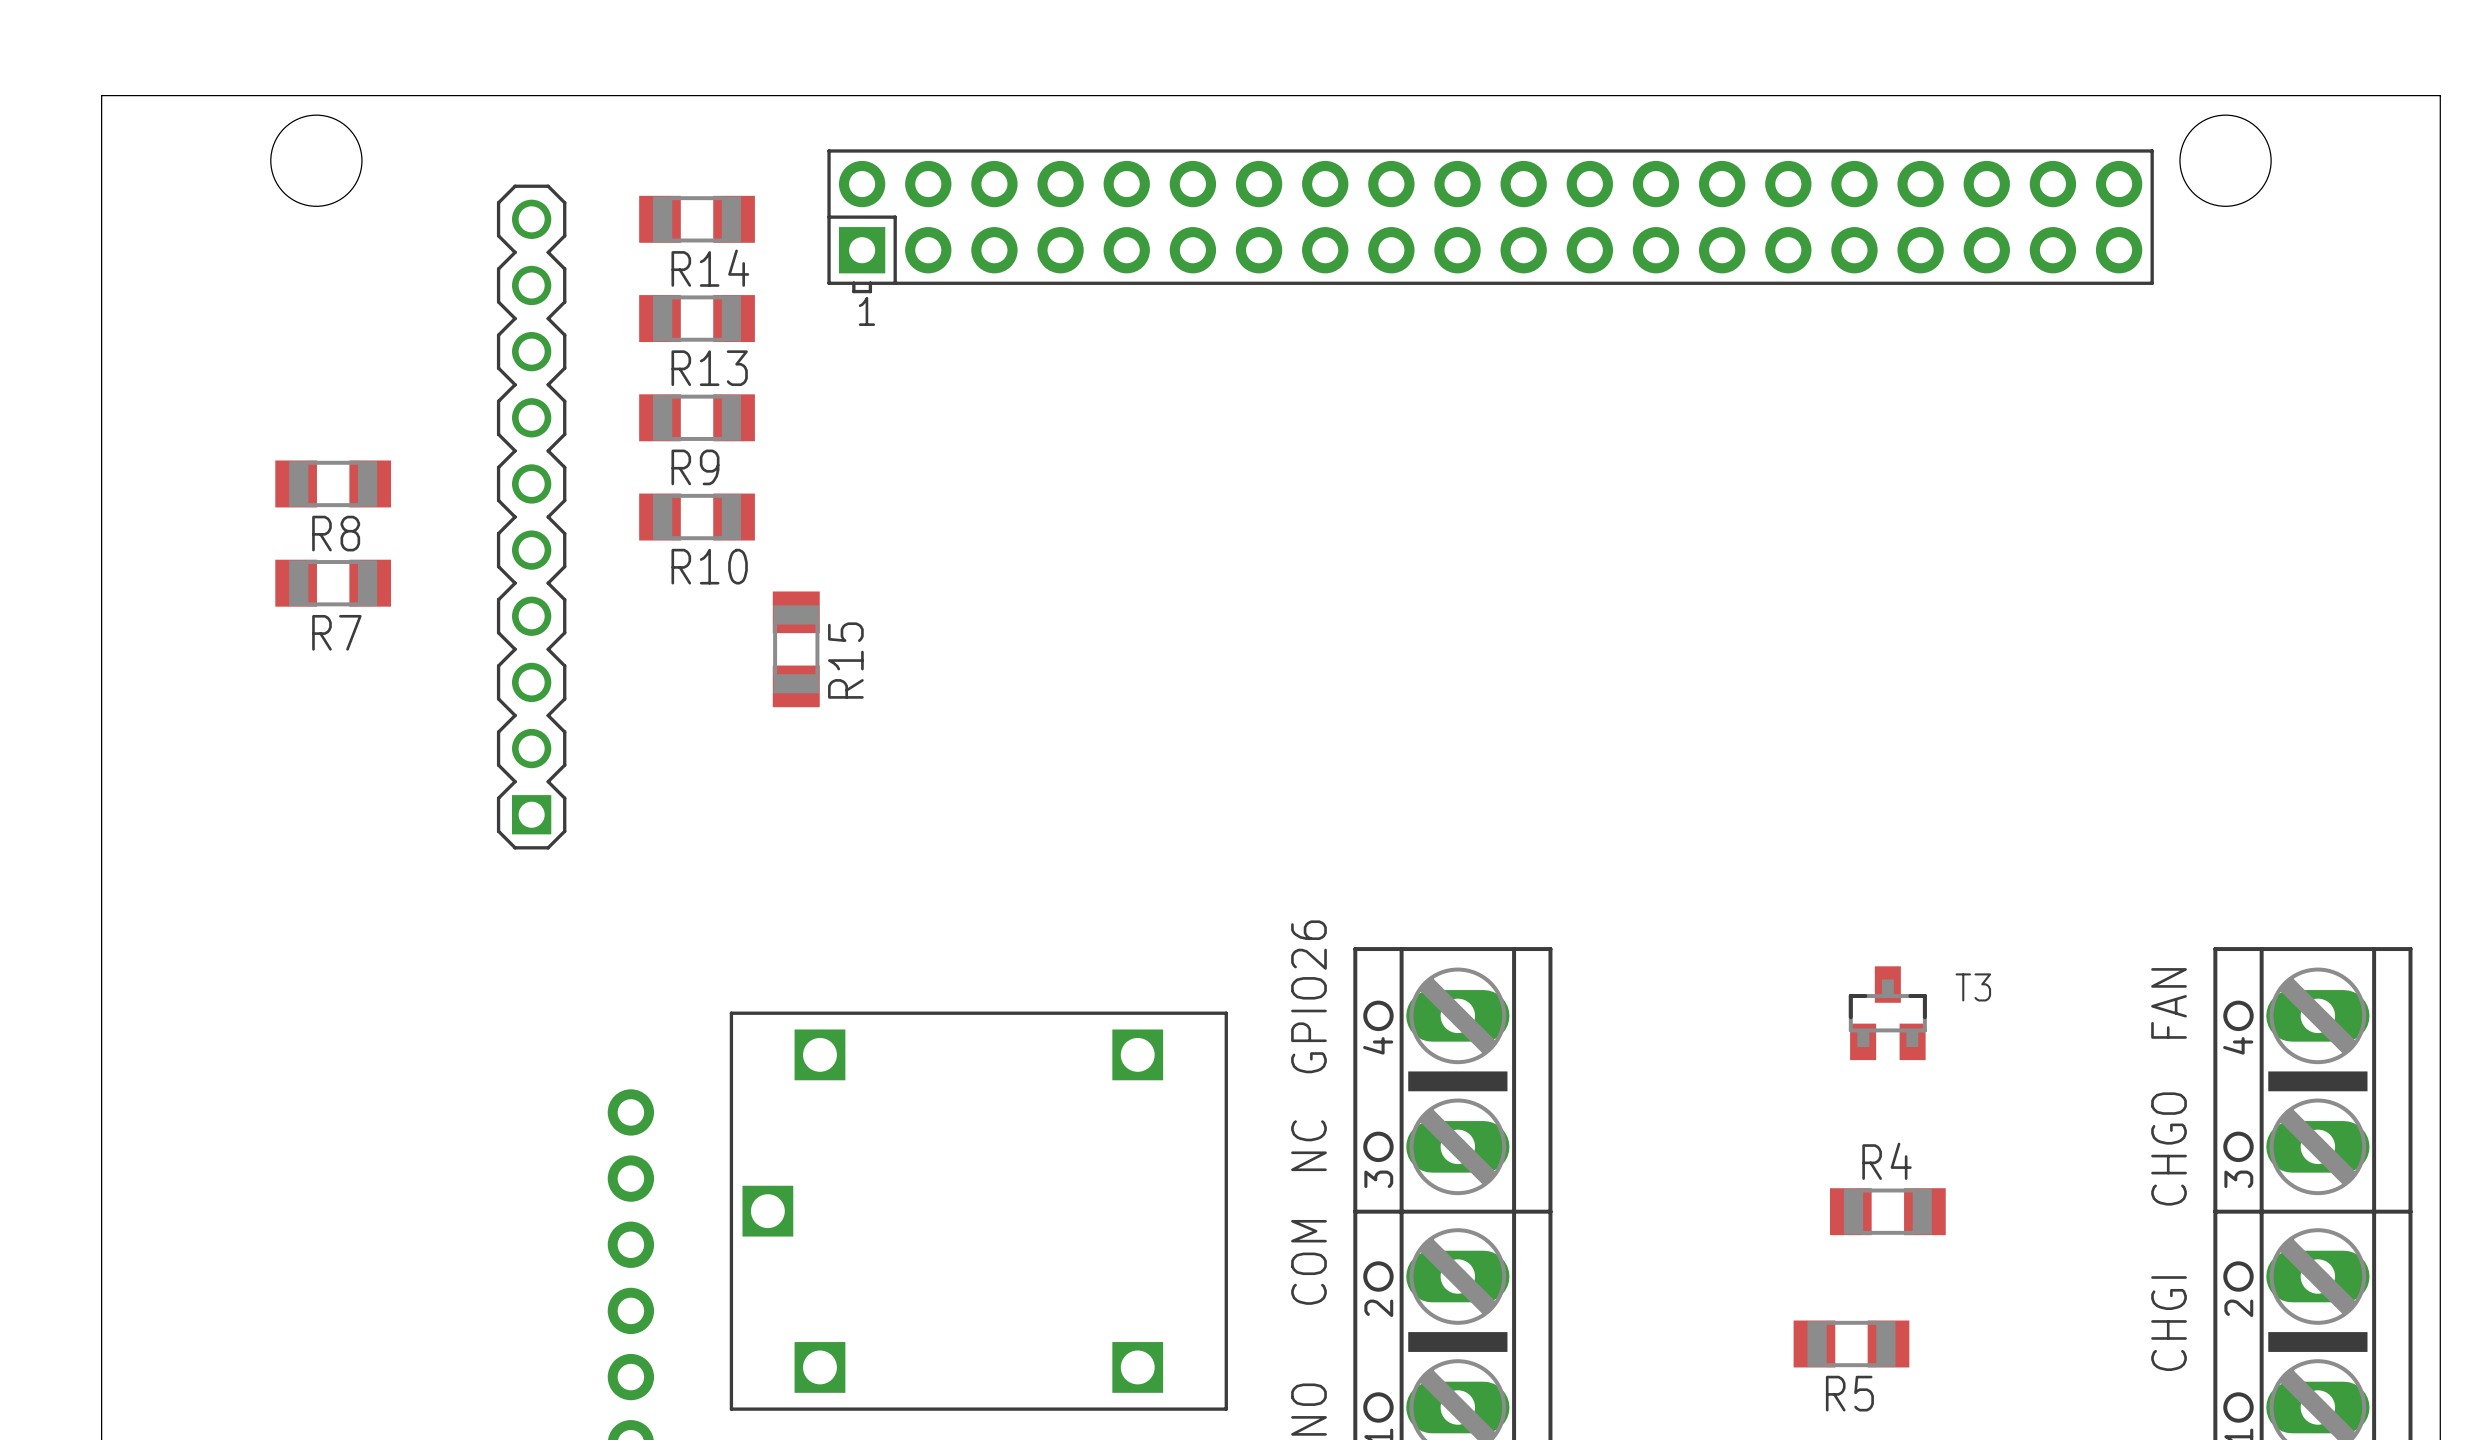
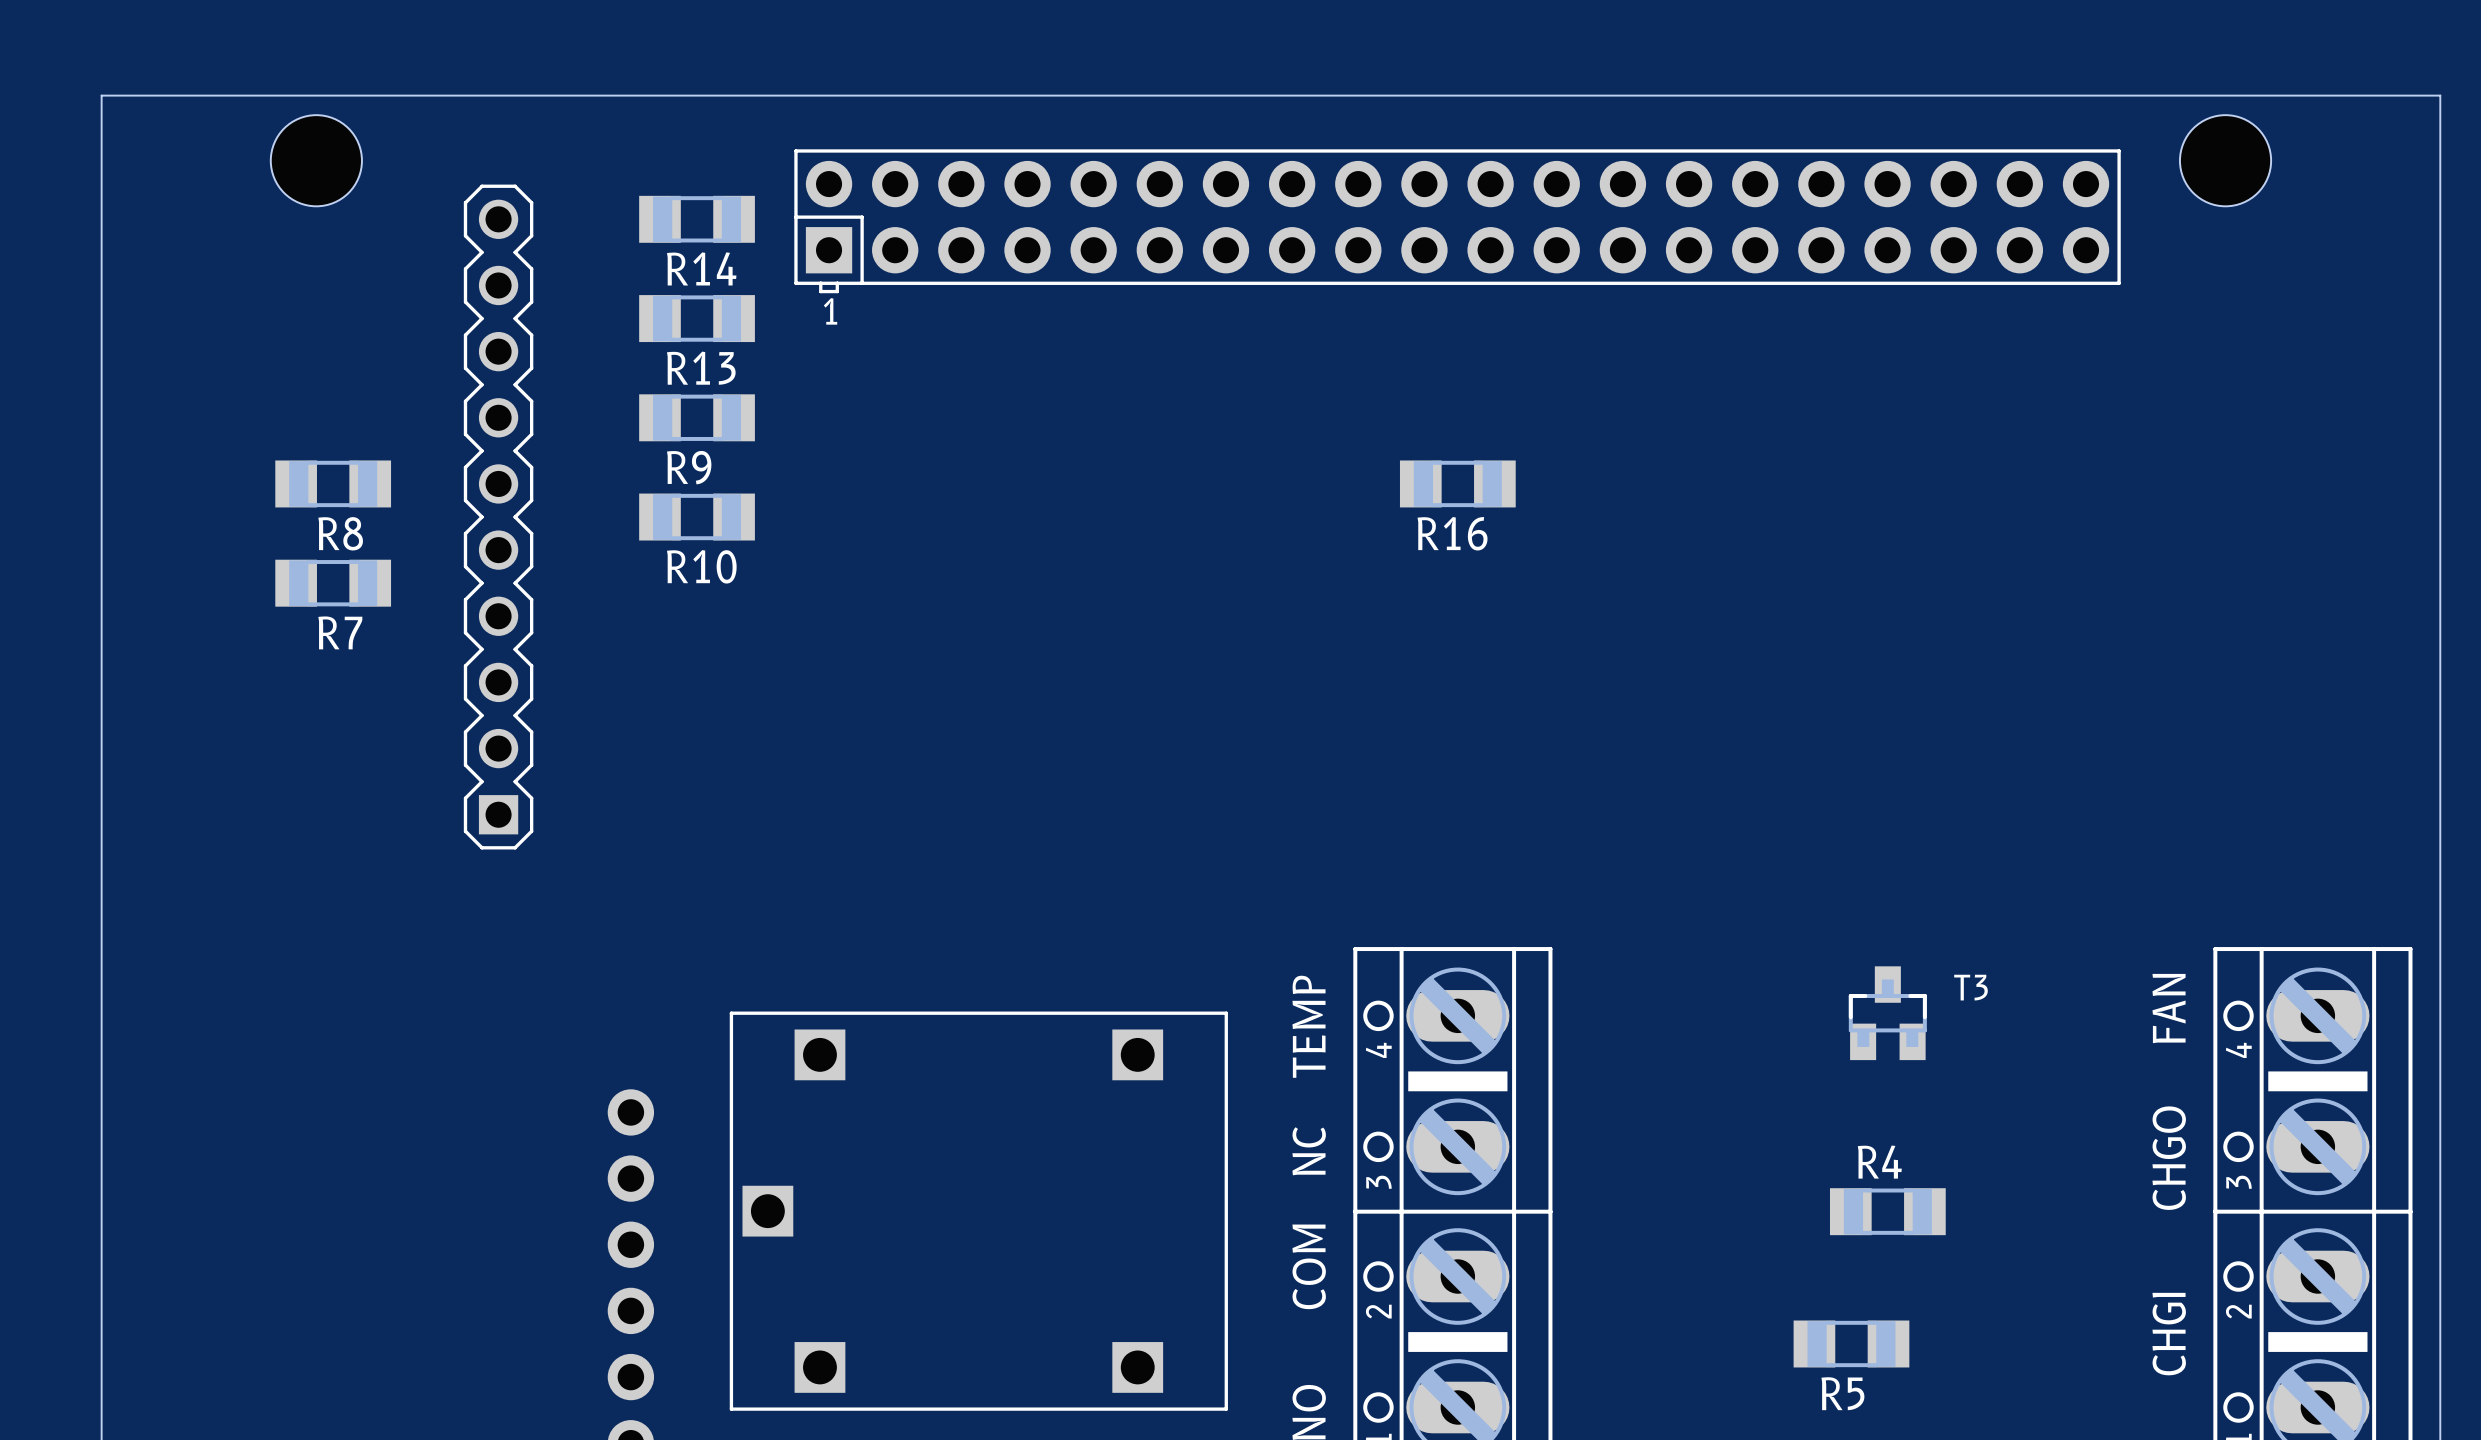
part position: (1490, 221) -> (1457, 221)
R16: none -> (1457, 483)
part position: (531, 517) -> (498, 517)
R15: (796, 649) -> none
text: GPIO26 (1308, 996) -> TEMP (1308, 1026)

